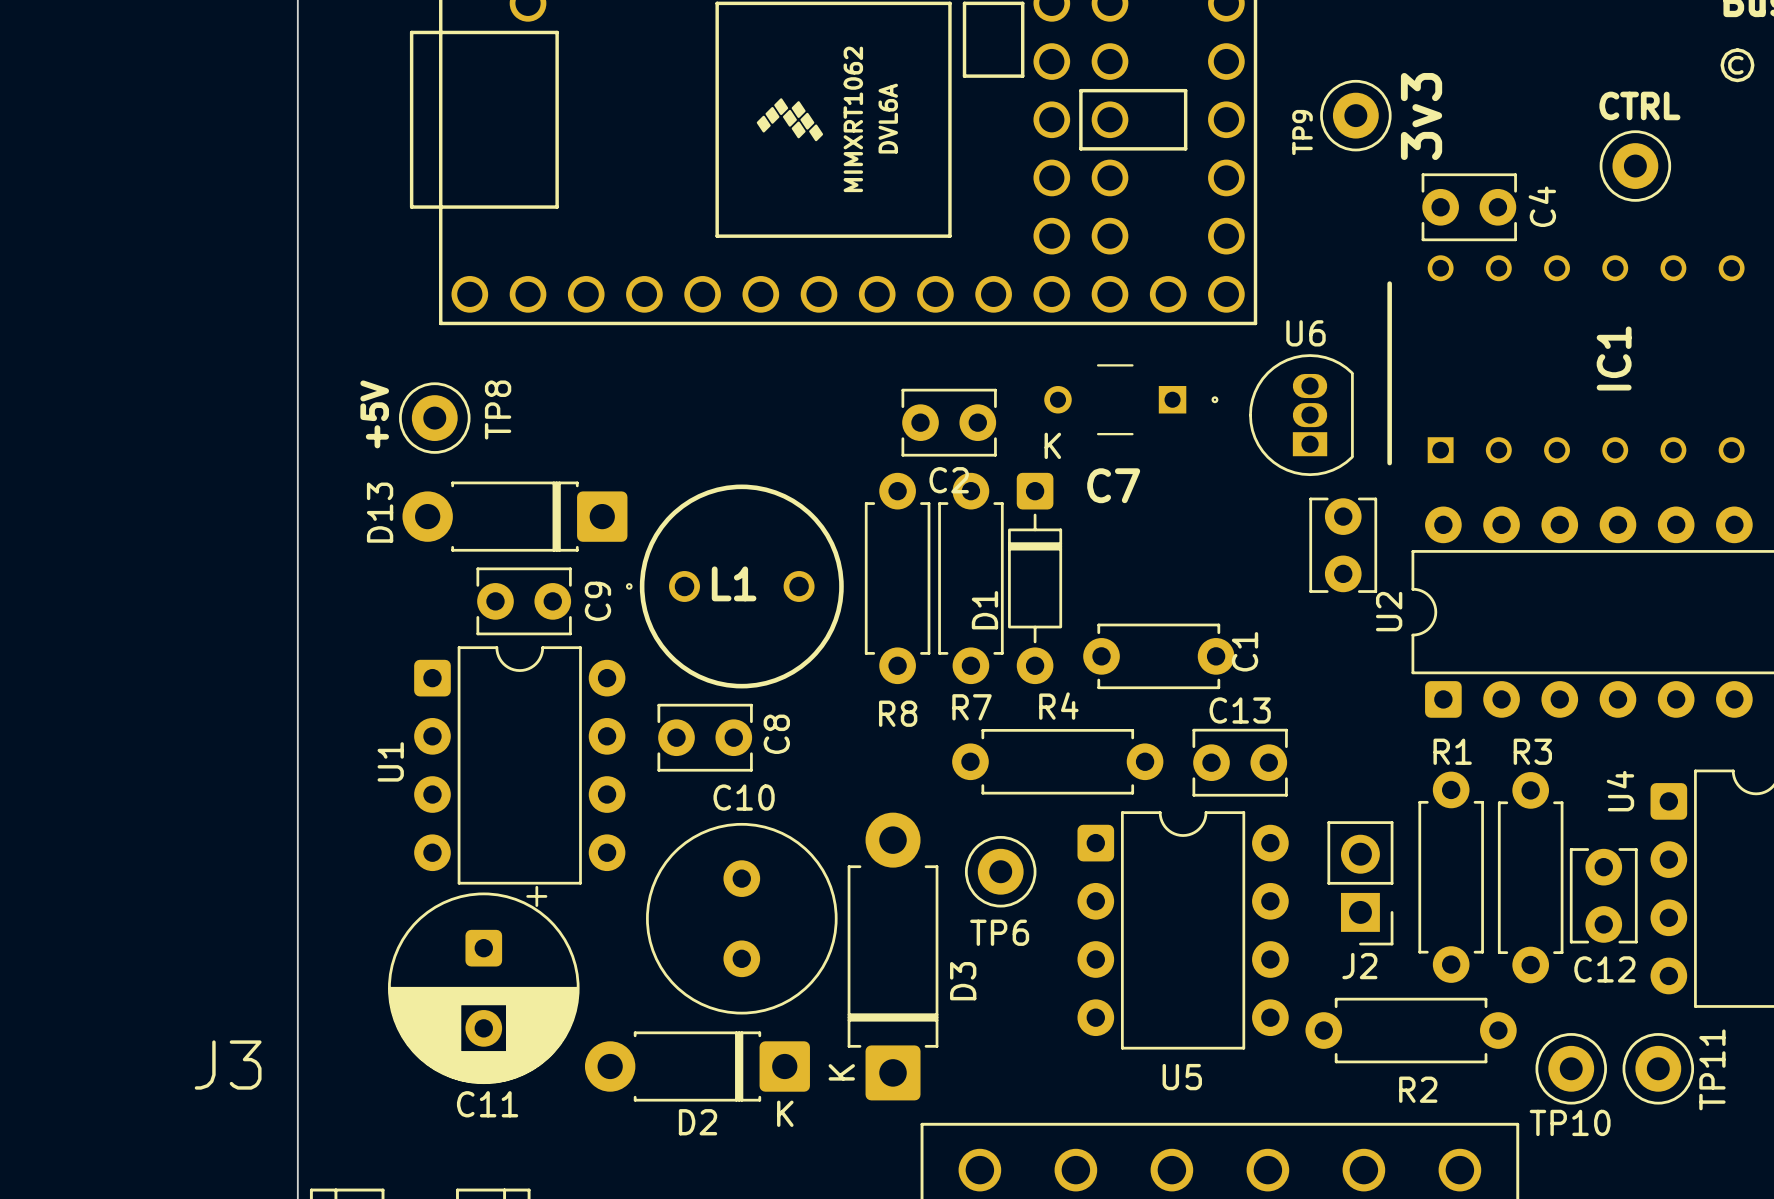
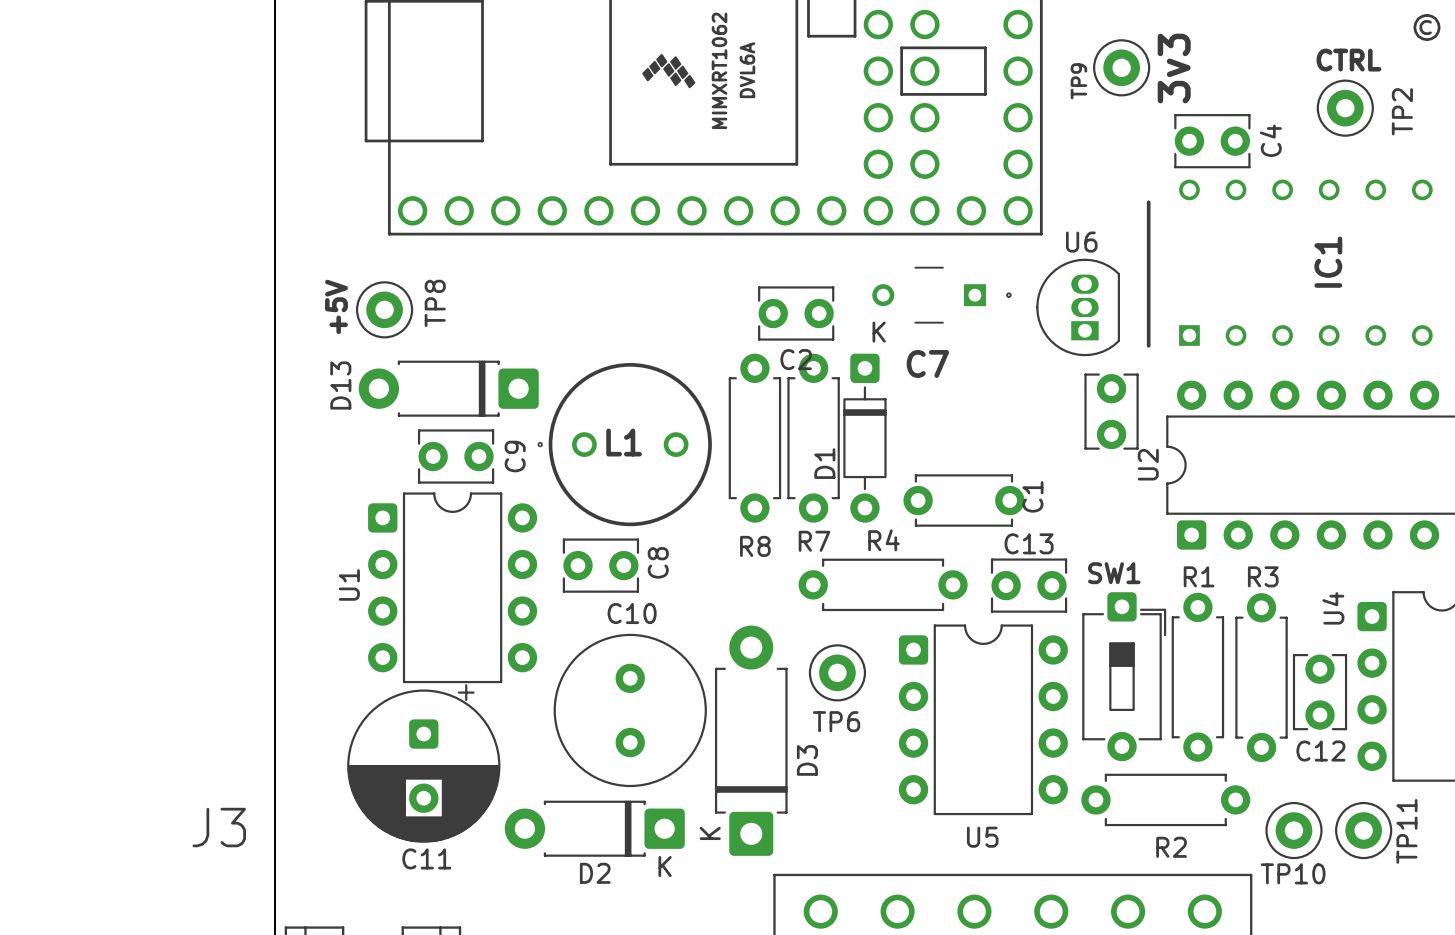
TP2 name: none -> TP2 (1402, 111)
SW1: none -> (1124, 676)
J2: (1360, 883) -> none

